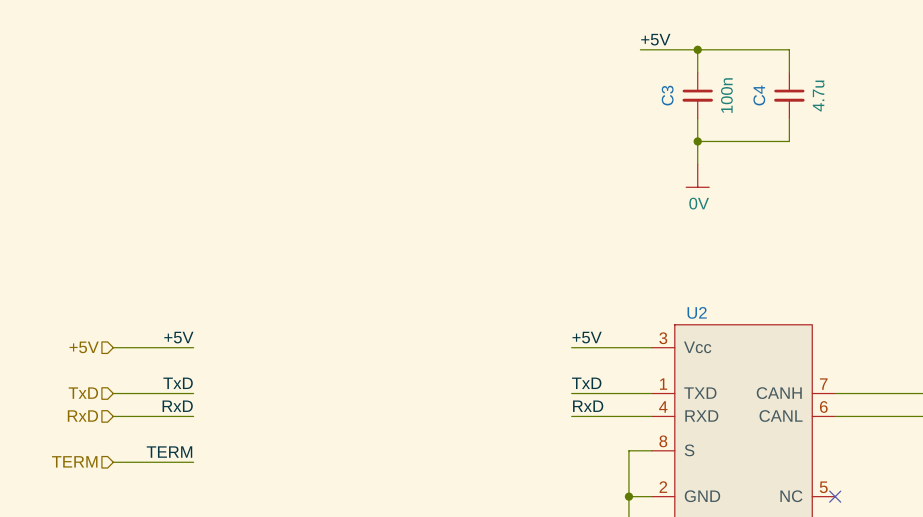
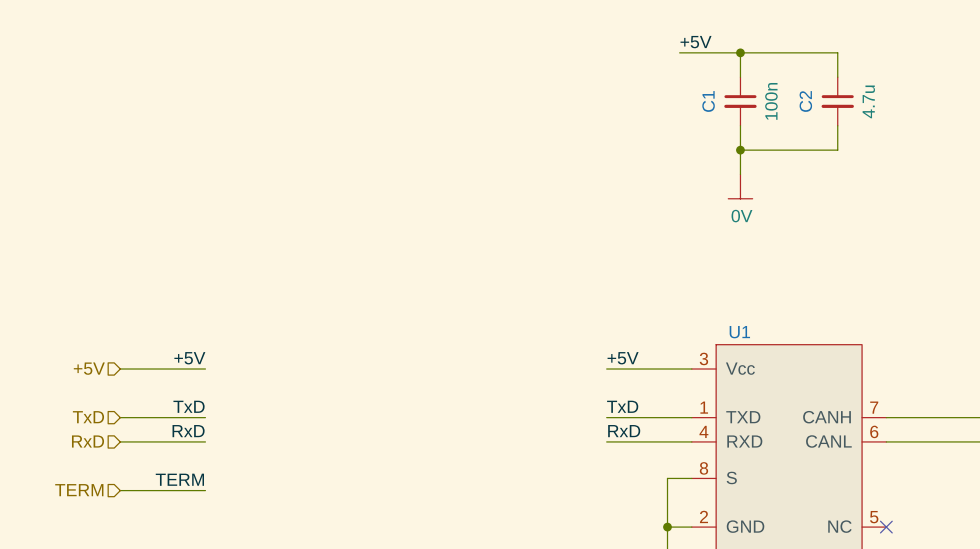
C3 name: C3 (667, 95) -> C1 (708, 101)
C4 name: C4 (759, 95) -> C2 (805, 101)
U2 name: U2 (697, 312) -> U1 (739, 332)

